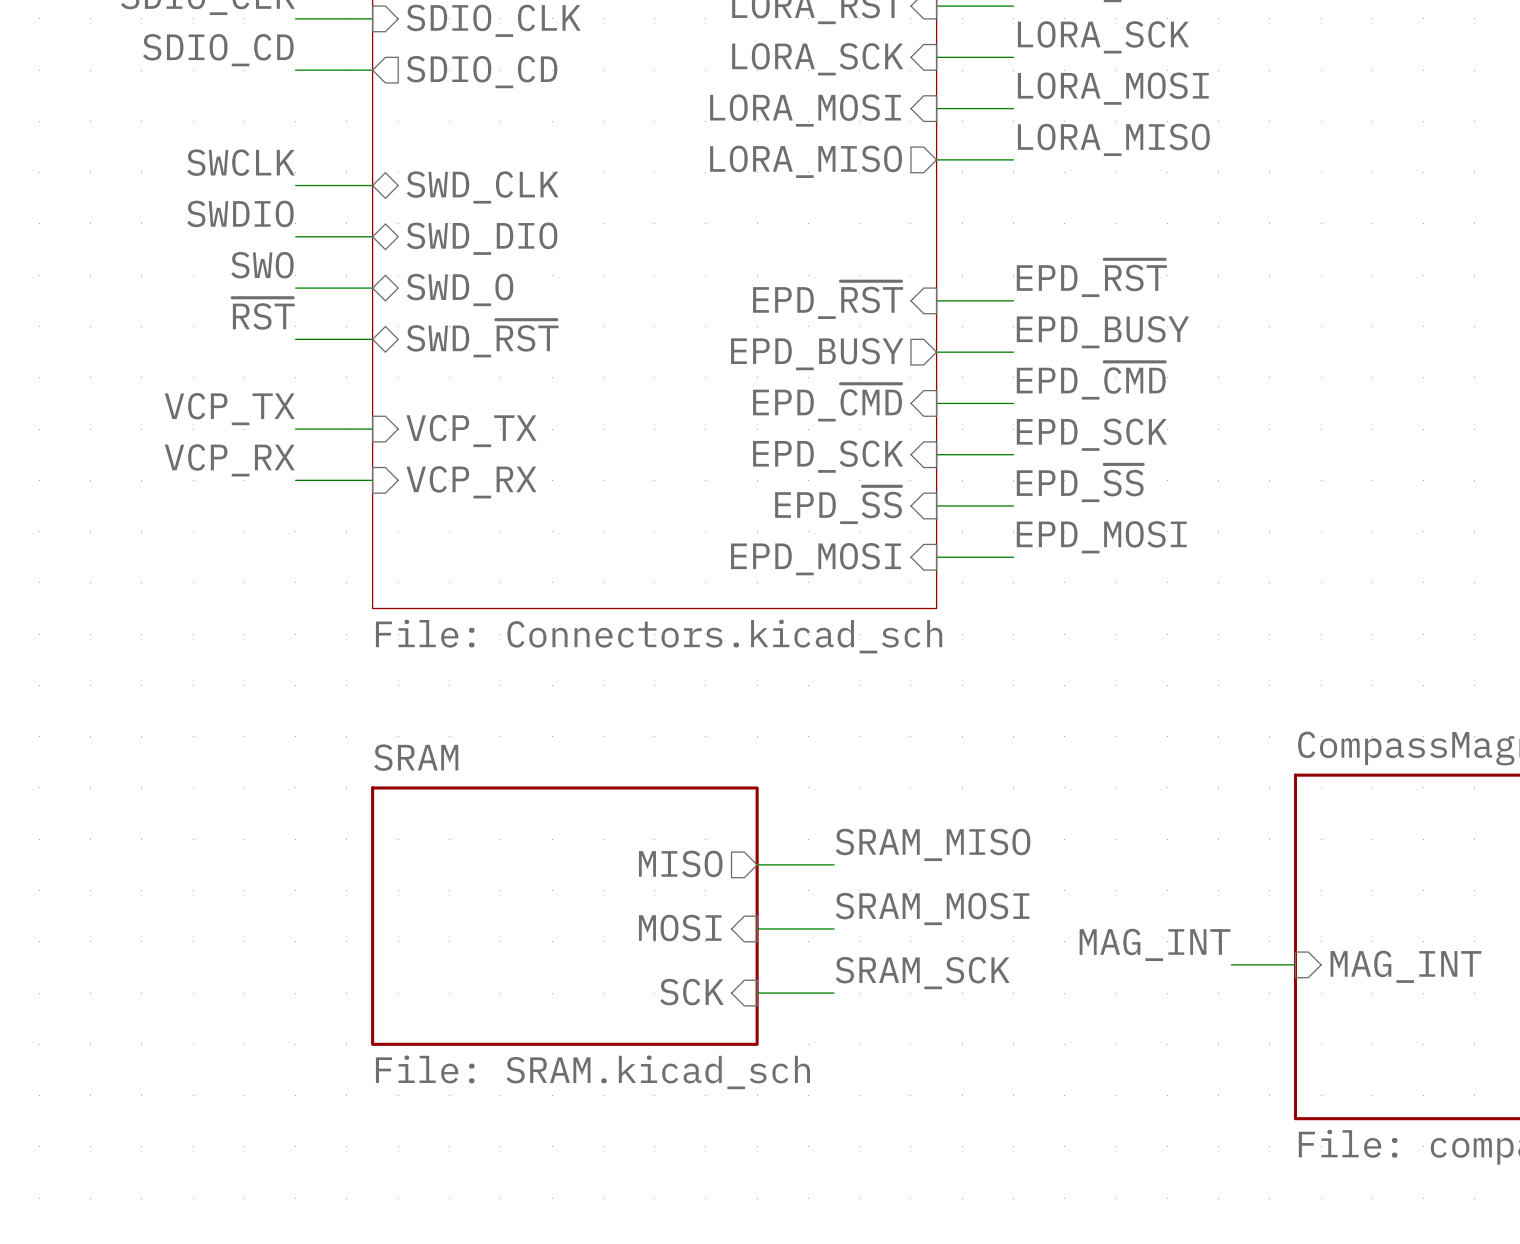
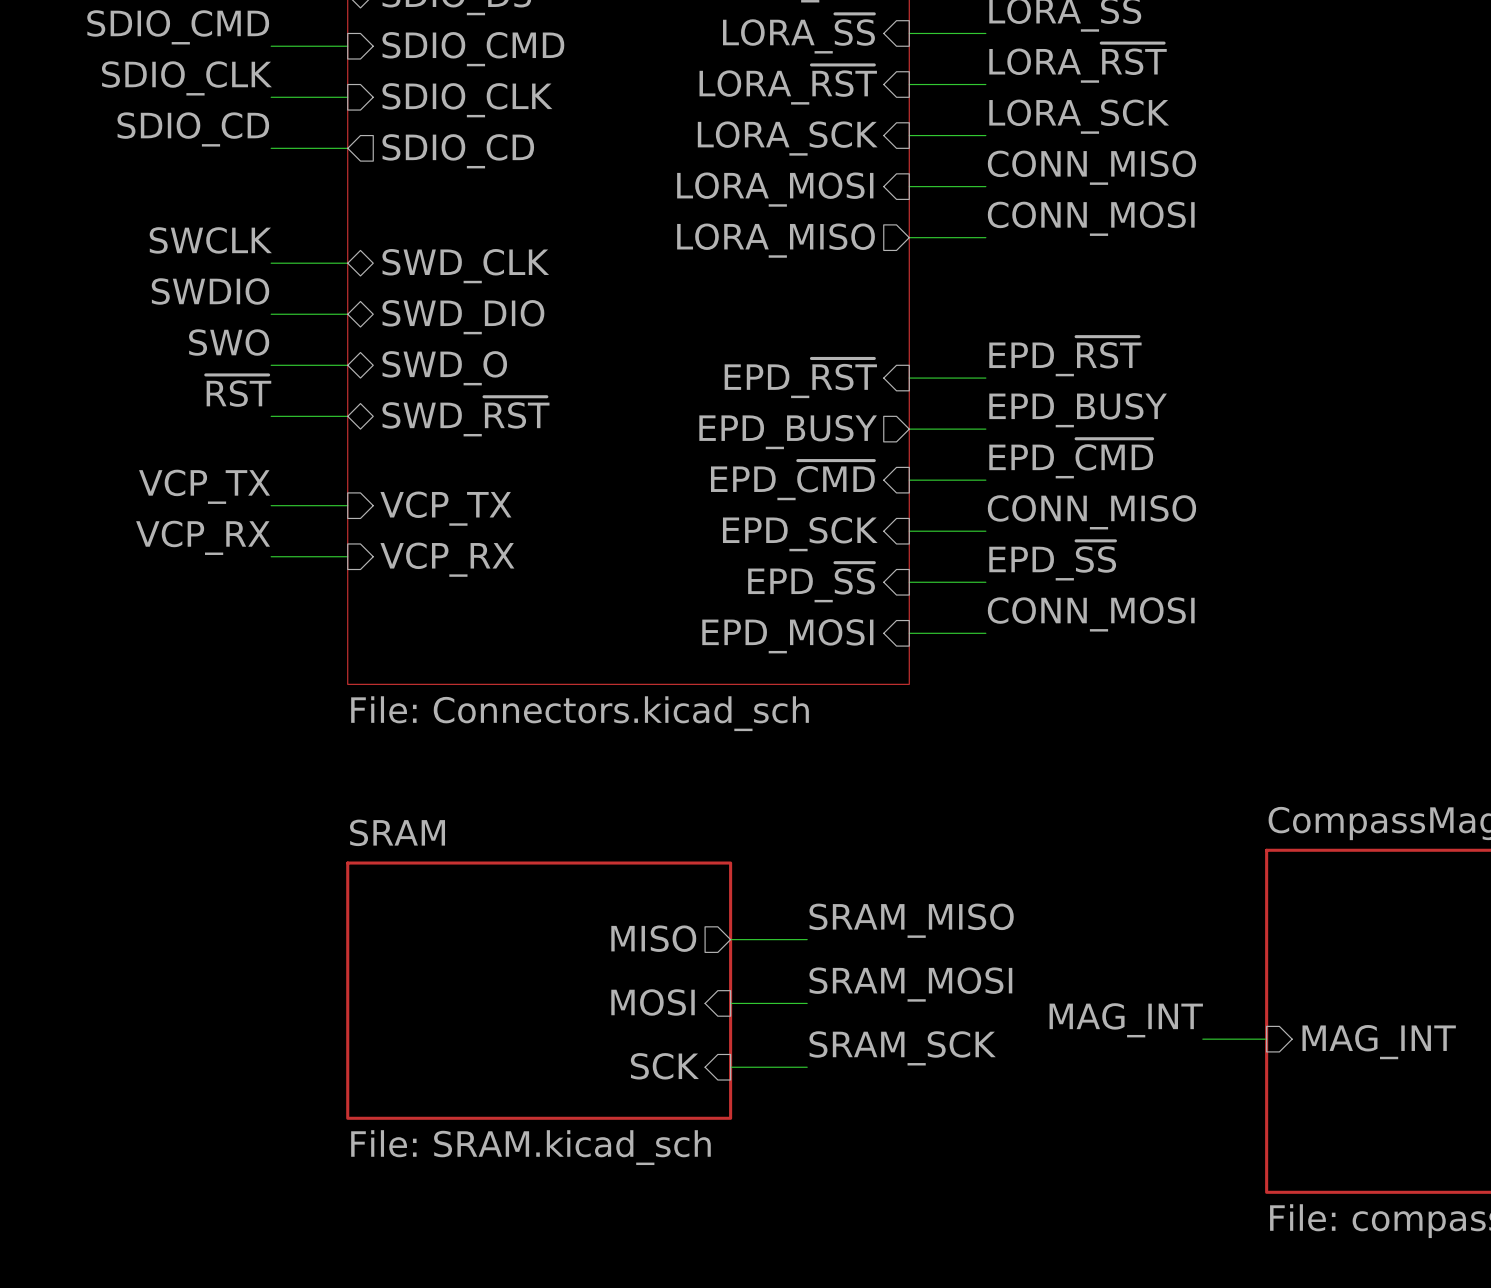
label: LORA_MOSI (1113, 88) -> CONN_MISO (1091, 167)
label: LORA_MISO (1113, 139) -> CONN_MOSI (1091, 218)
label: EPD_SCK (1091, 434) -> CONN_MISO (1091, 512)
label: EPD_MOSI (1101, 537) -> CONN_MOSI (1091, 614)

